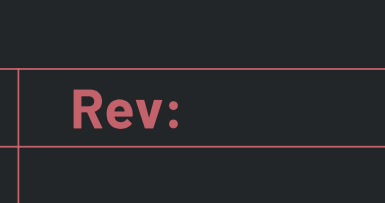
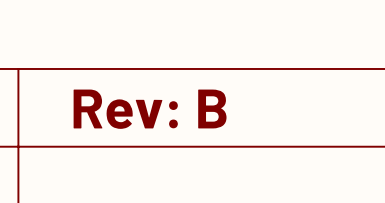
title block: Rev: (125, 109) -> Rev: B (150, 109)

